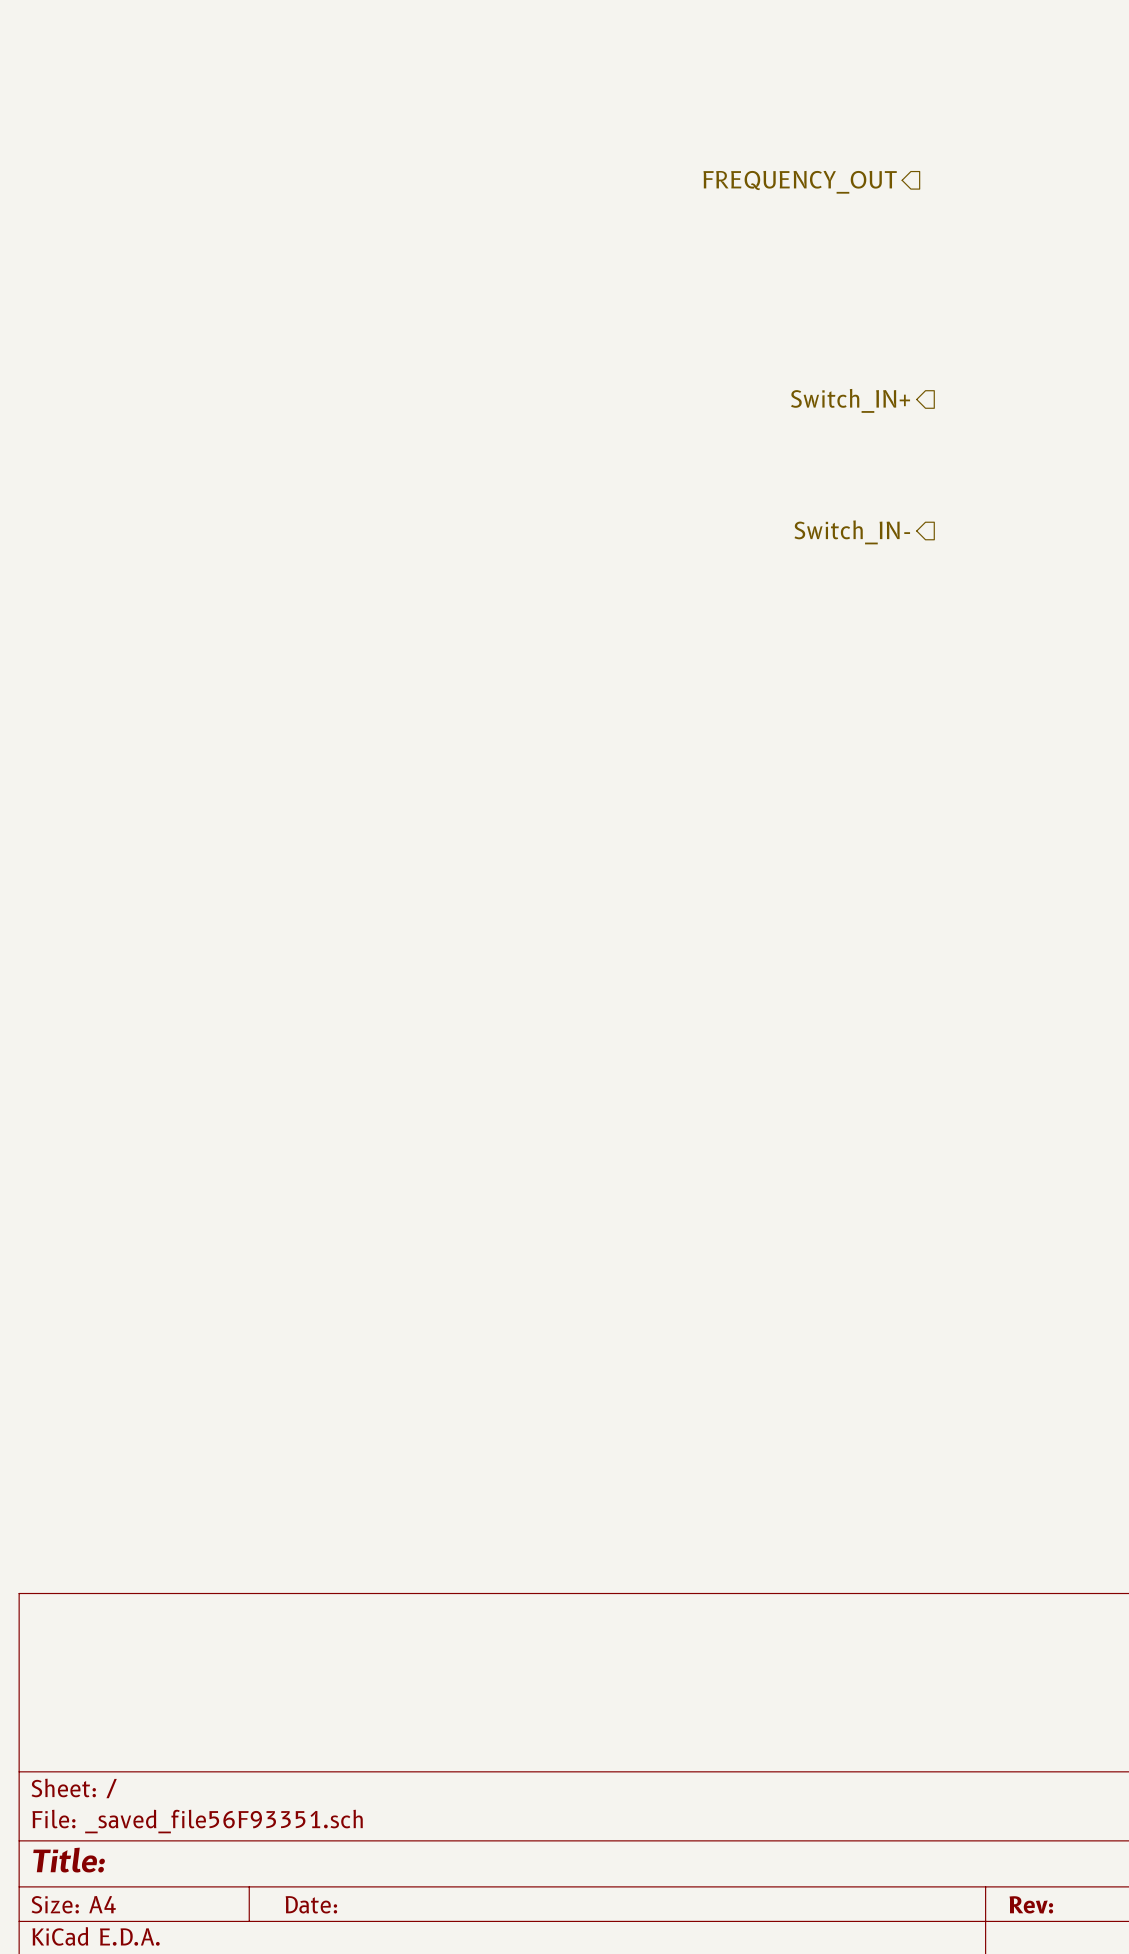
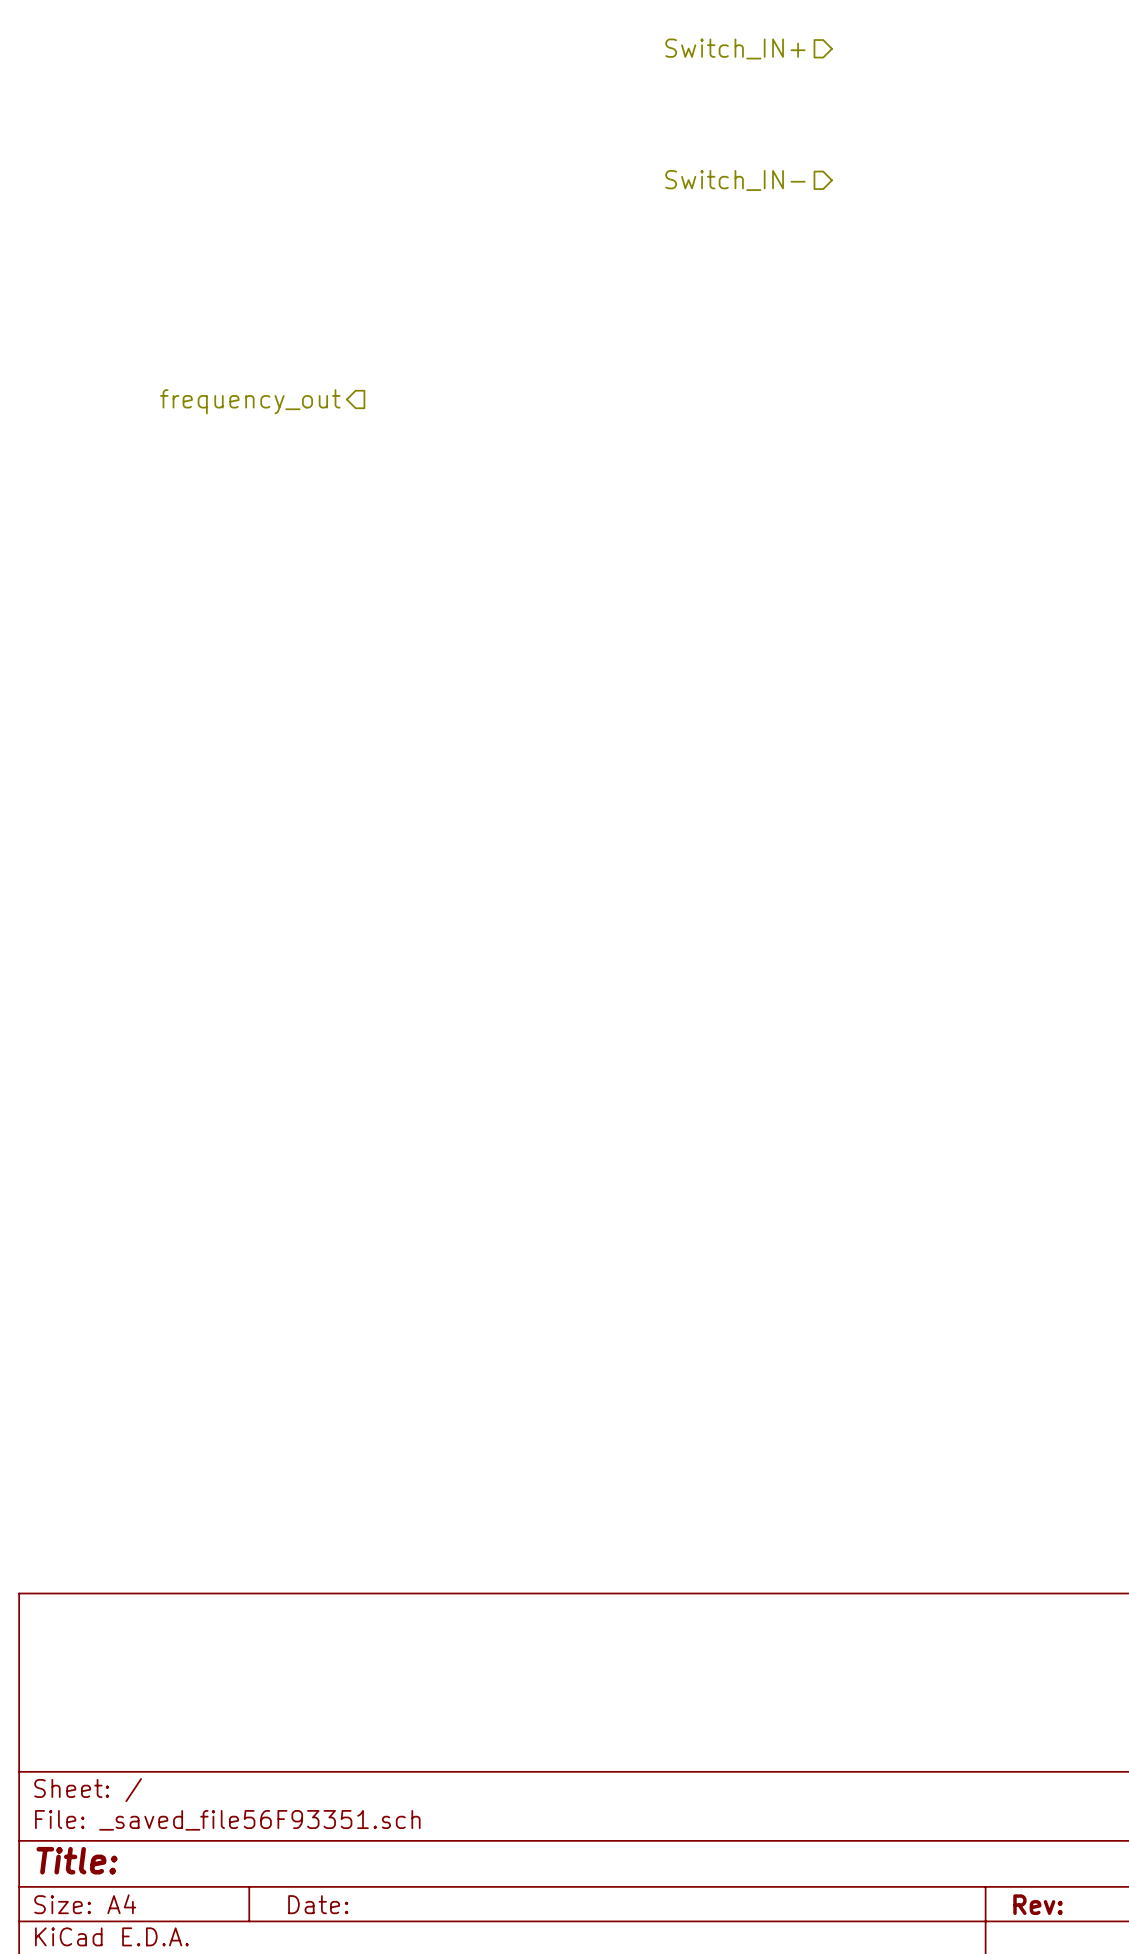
hierarchical label: none -> Switch_IN+ (735, 48)
hierarchical label: none -> Switch_IN- (735, 180)
hierarchical label: FREQUENCY_OUT (800, 182) -> none
hierarchical label: Switch_IN+ (850, 400) -> none
hierarchical label: none -> frequency_out (250, 401)
hierarchical label: Switch_IN- (852, 532) -> none

